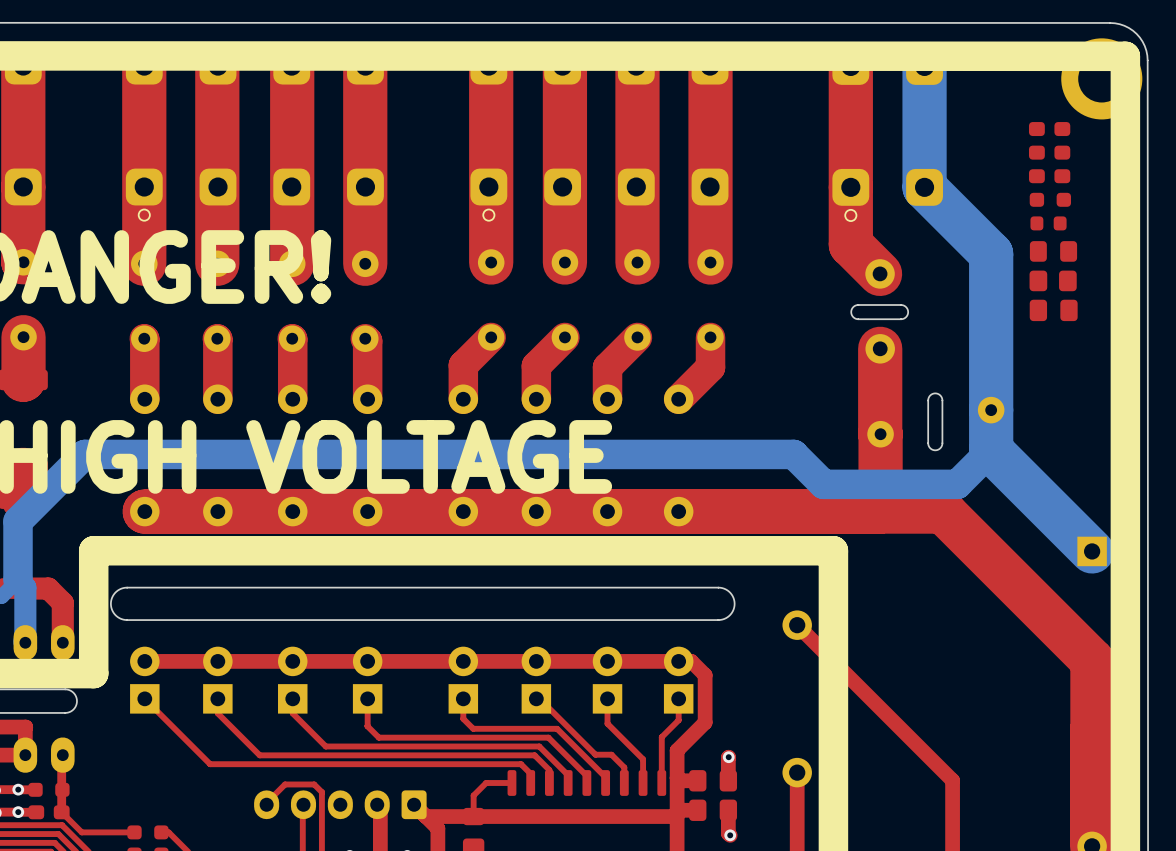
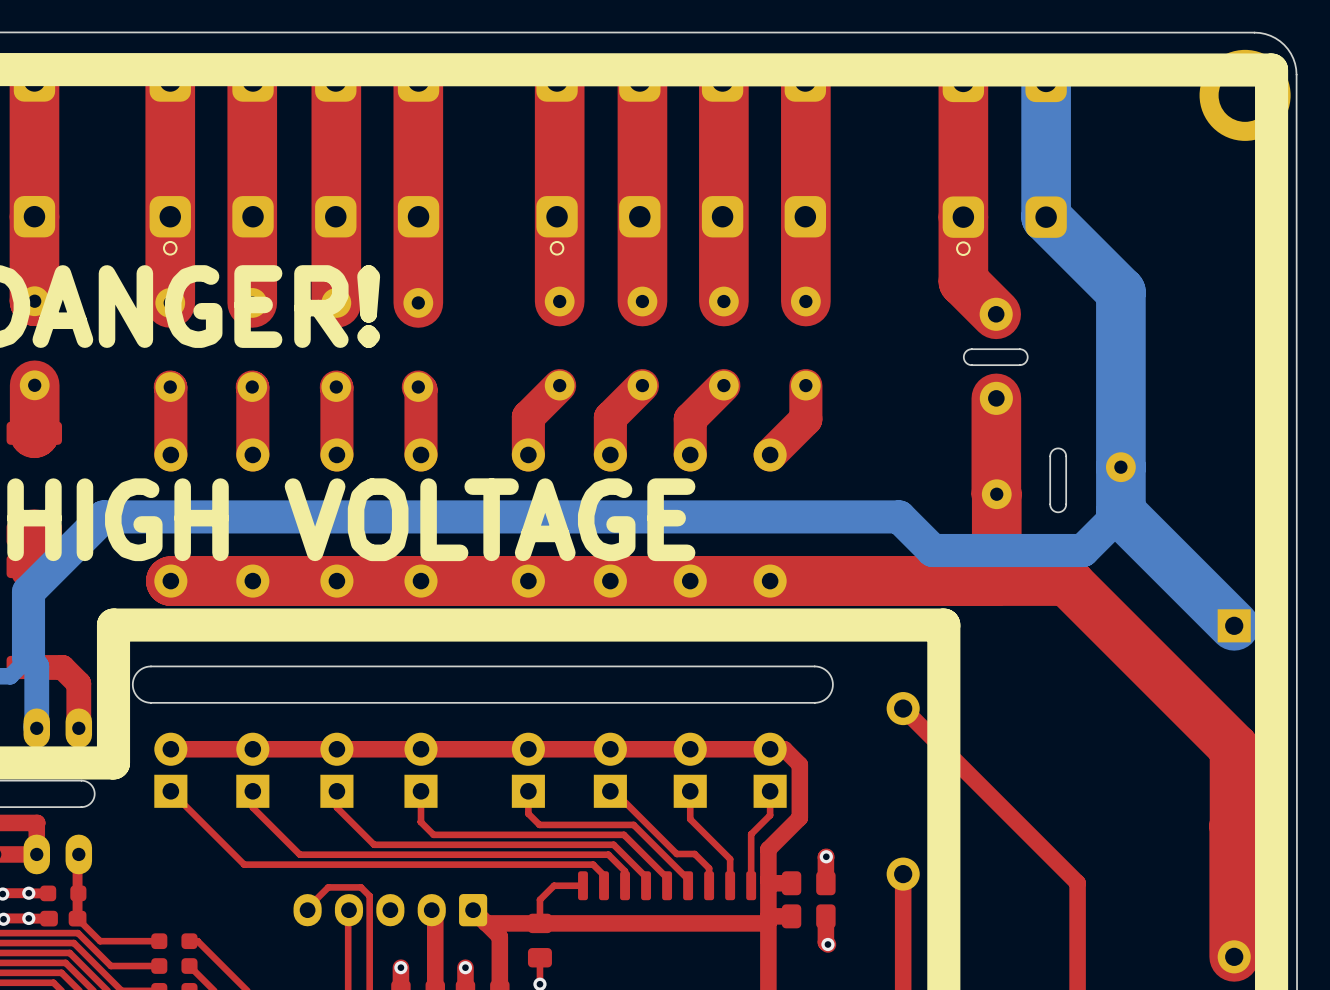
part: (1049, 129) -> none
part: (1049, 152) -> none
part: (1049, 176) -> none
part: (1050, 199) -> none
part: (1048, 223) -> none
part: (1053, 251) -> none
part: (1053, 280) -> none
part: (1053, 310) -> none

